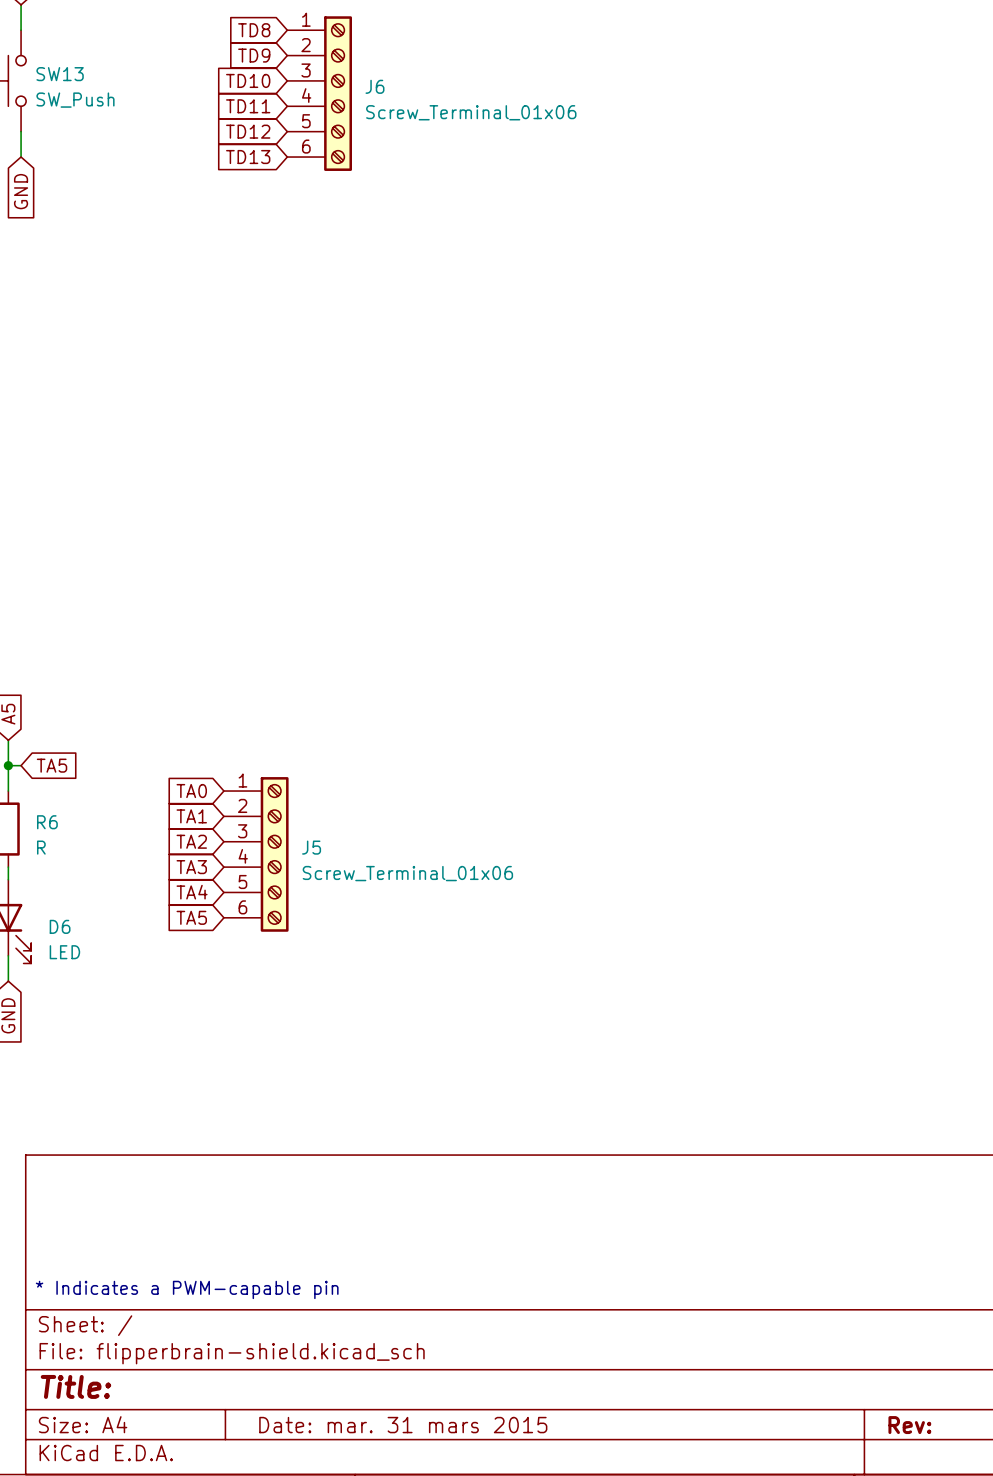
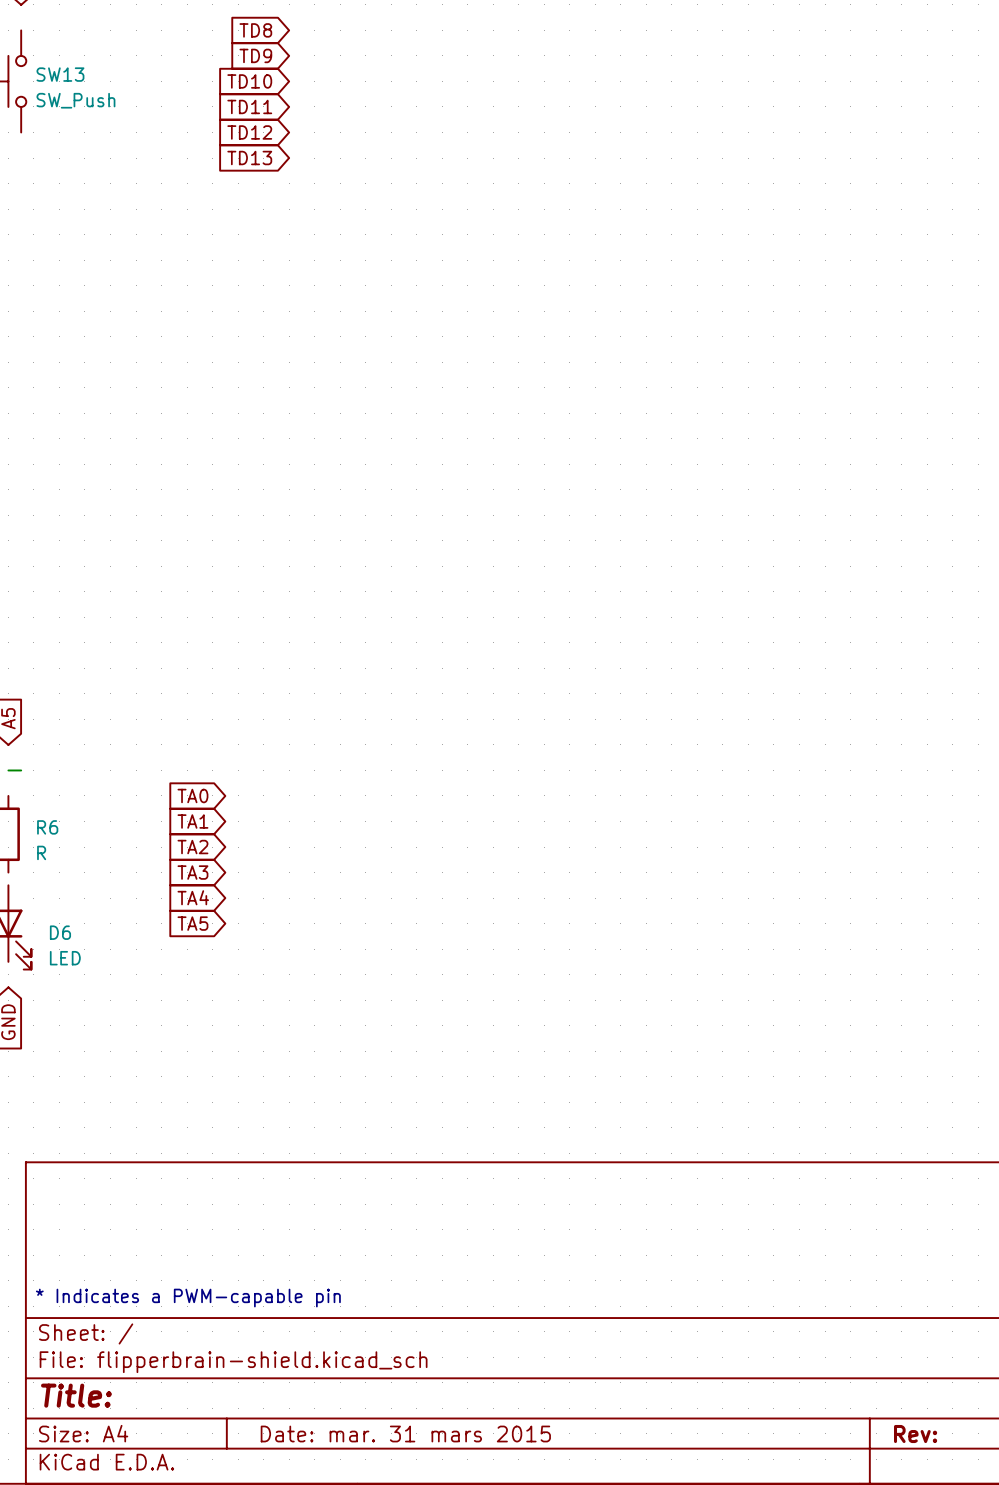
wire: (21, 4) (21, 30) -> none
J6: Screw_Terminal_01x06 (319, 93) -> none
wire: (21, 131) (21, 157) -> none
global label: GND (21, 191) -> none
wire: (8, 740) (8, 791) -> none
junction: (8, 765) -> none
global label: TA5 (52, 765) -> none
J5: Screw_Terminal_01x06 (256, 854) -> none
wire: (8, 867) (8, 879) -> none
wire: (8, 955) (8, 981) -> none

